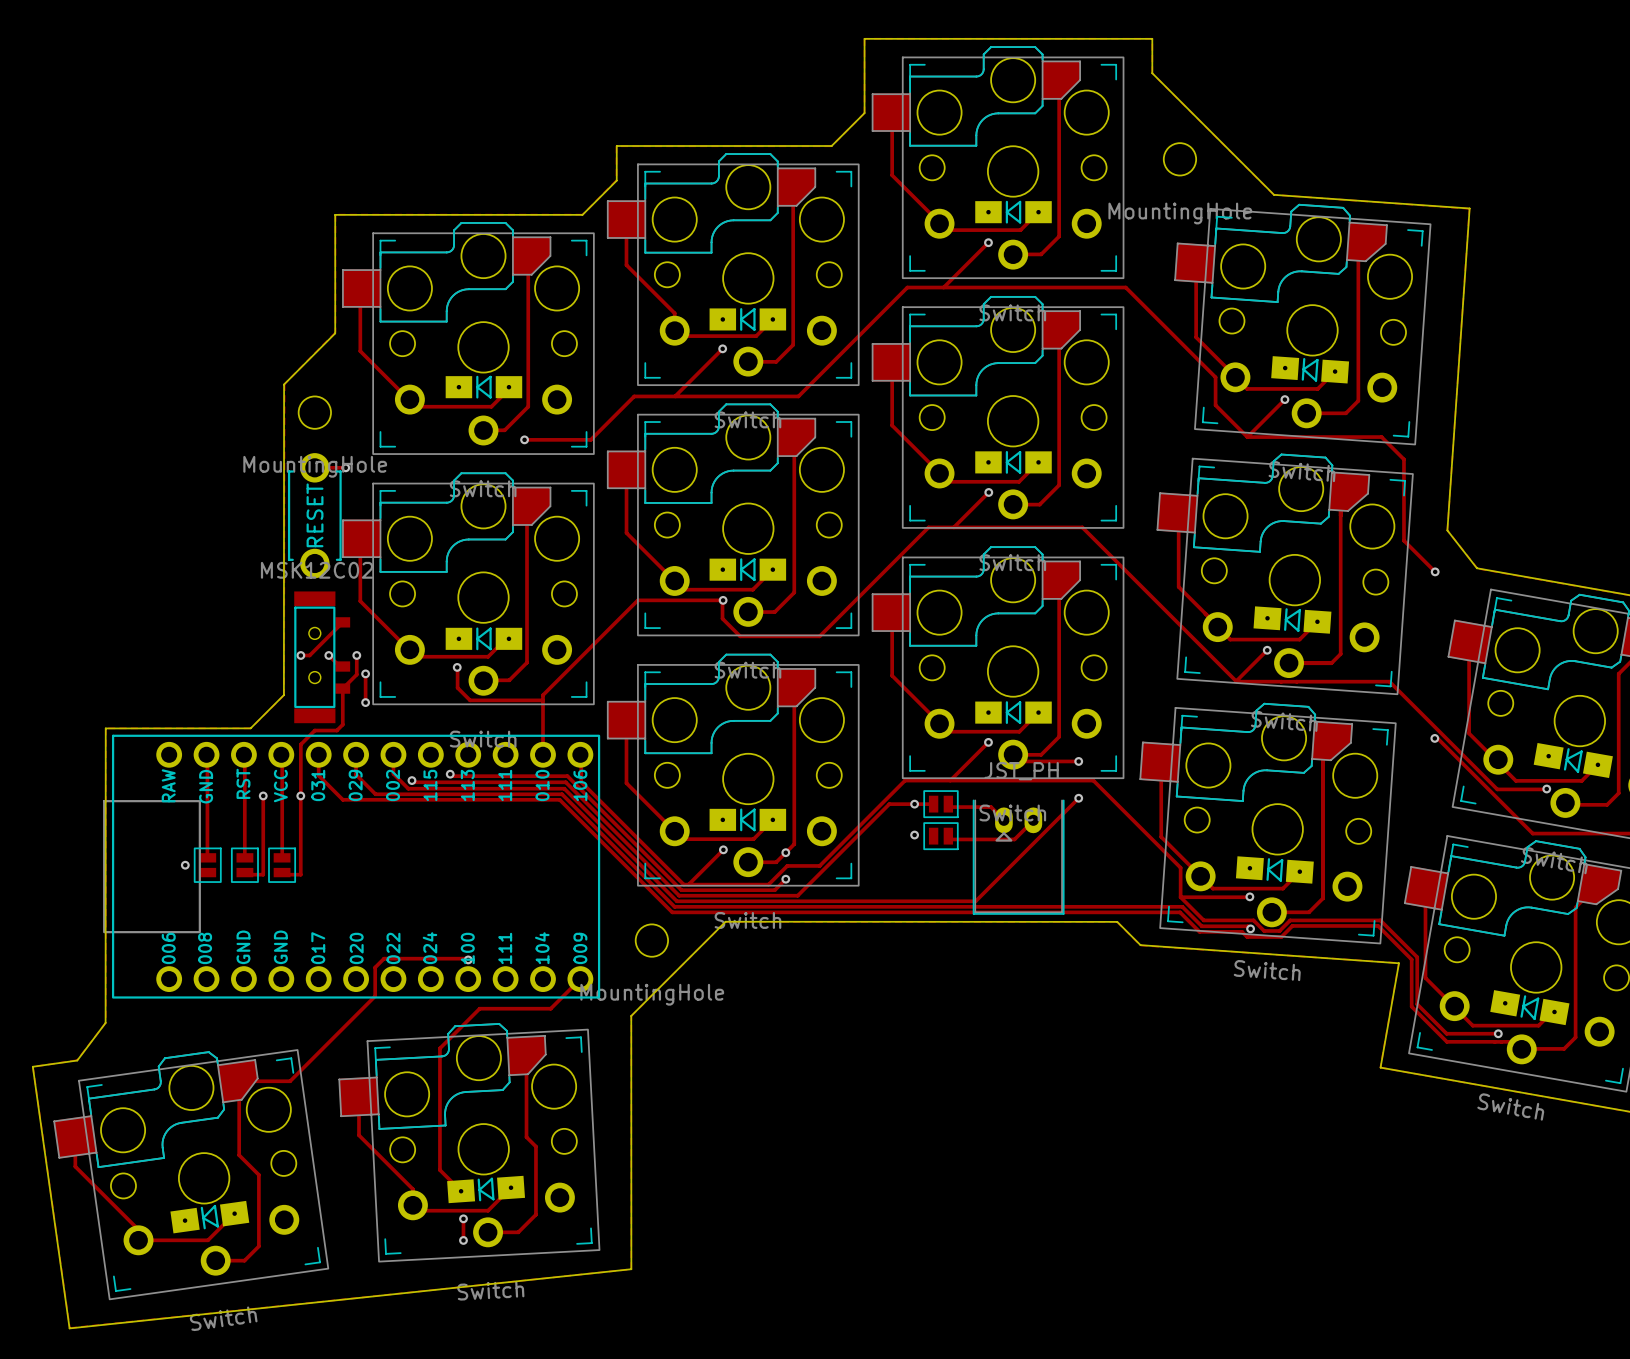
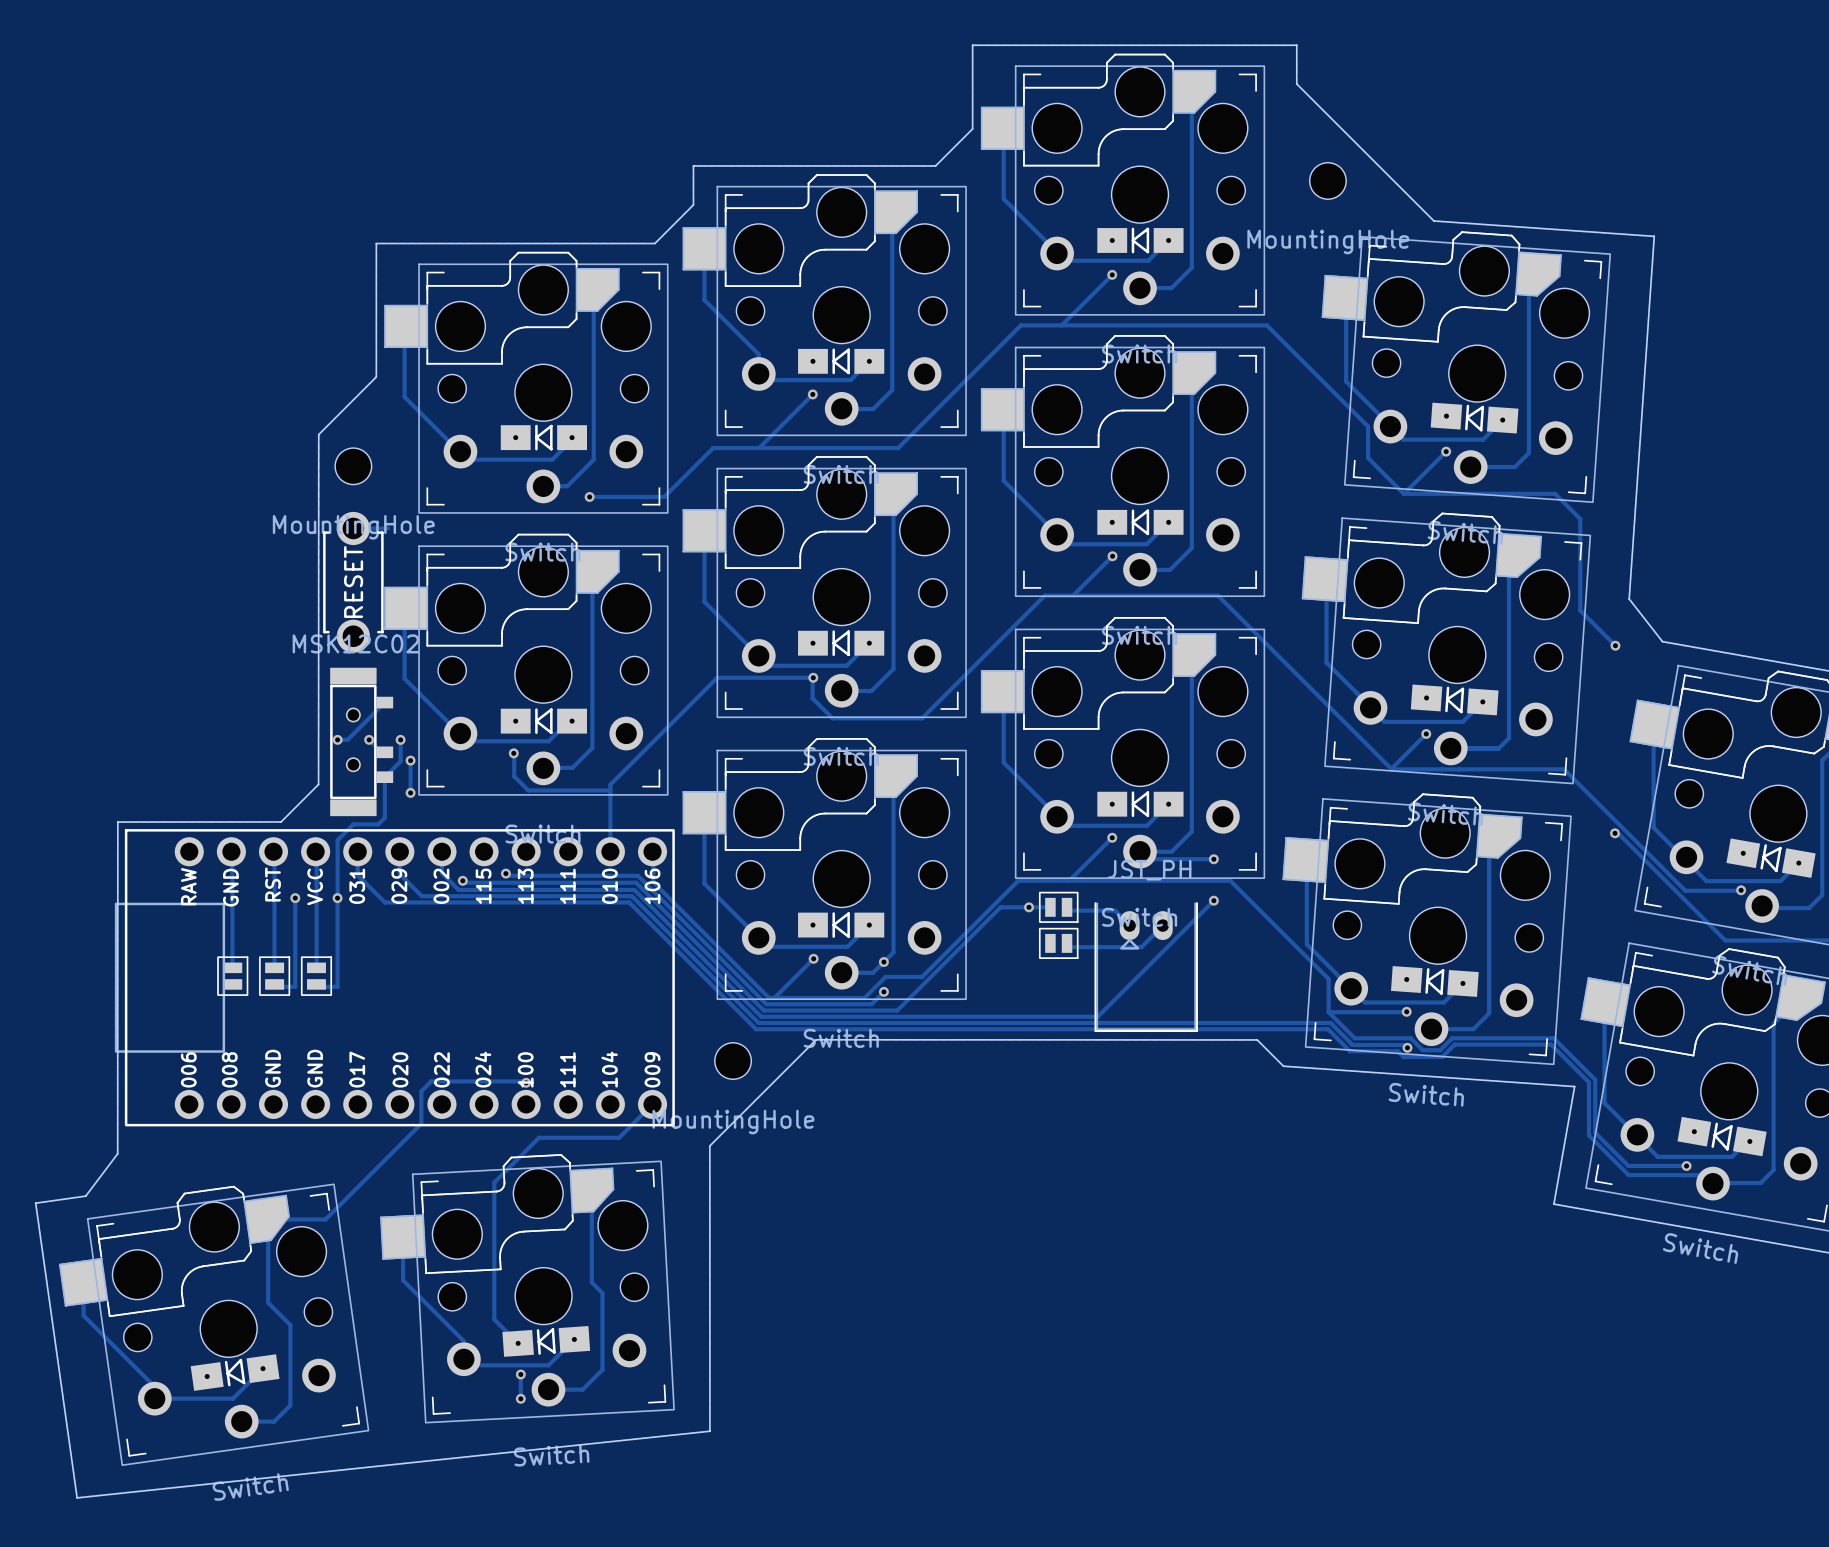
via: (345, 467) -> none
via: (914, 835) -> none
via: (185, 865) -> none

